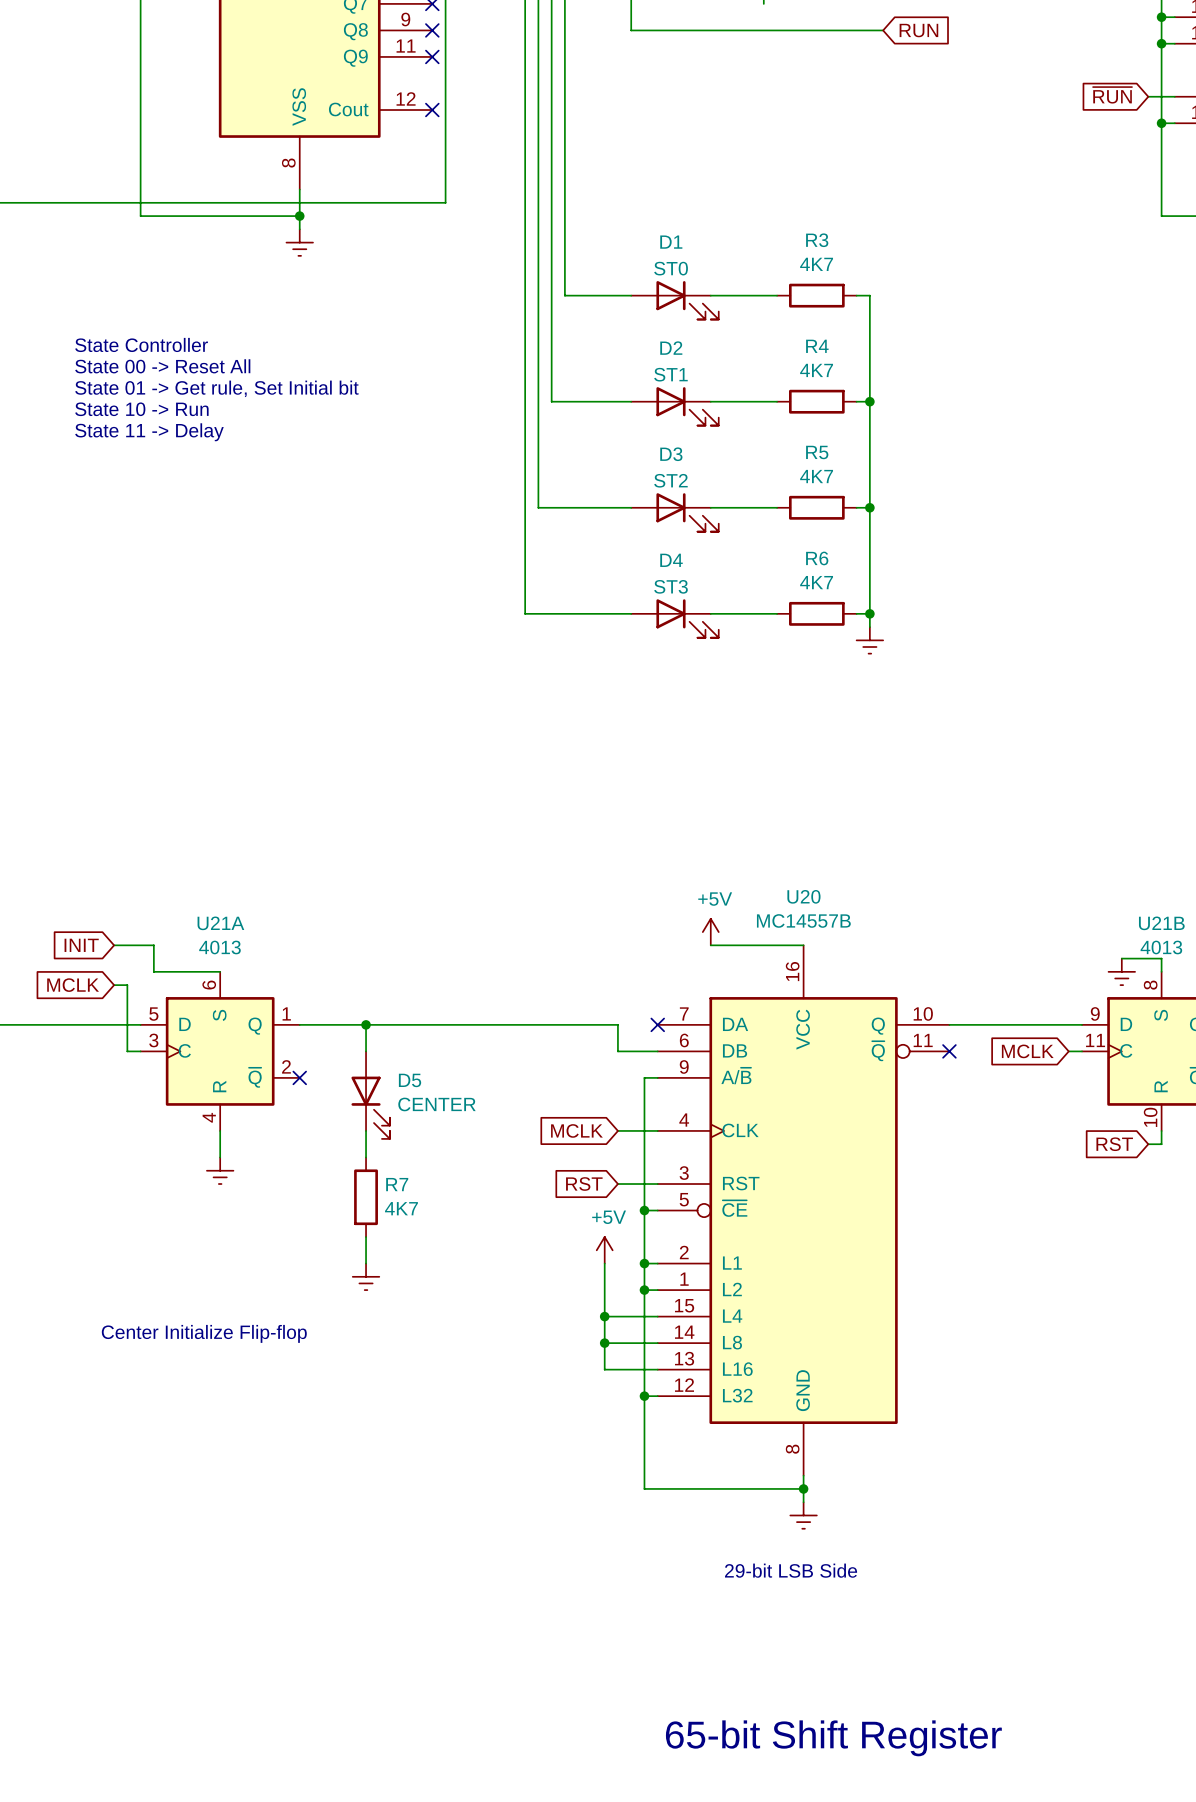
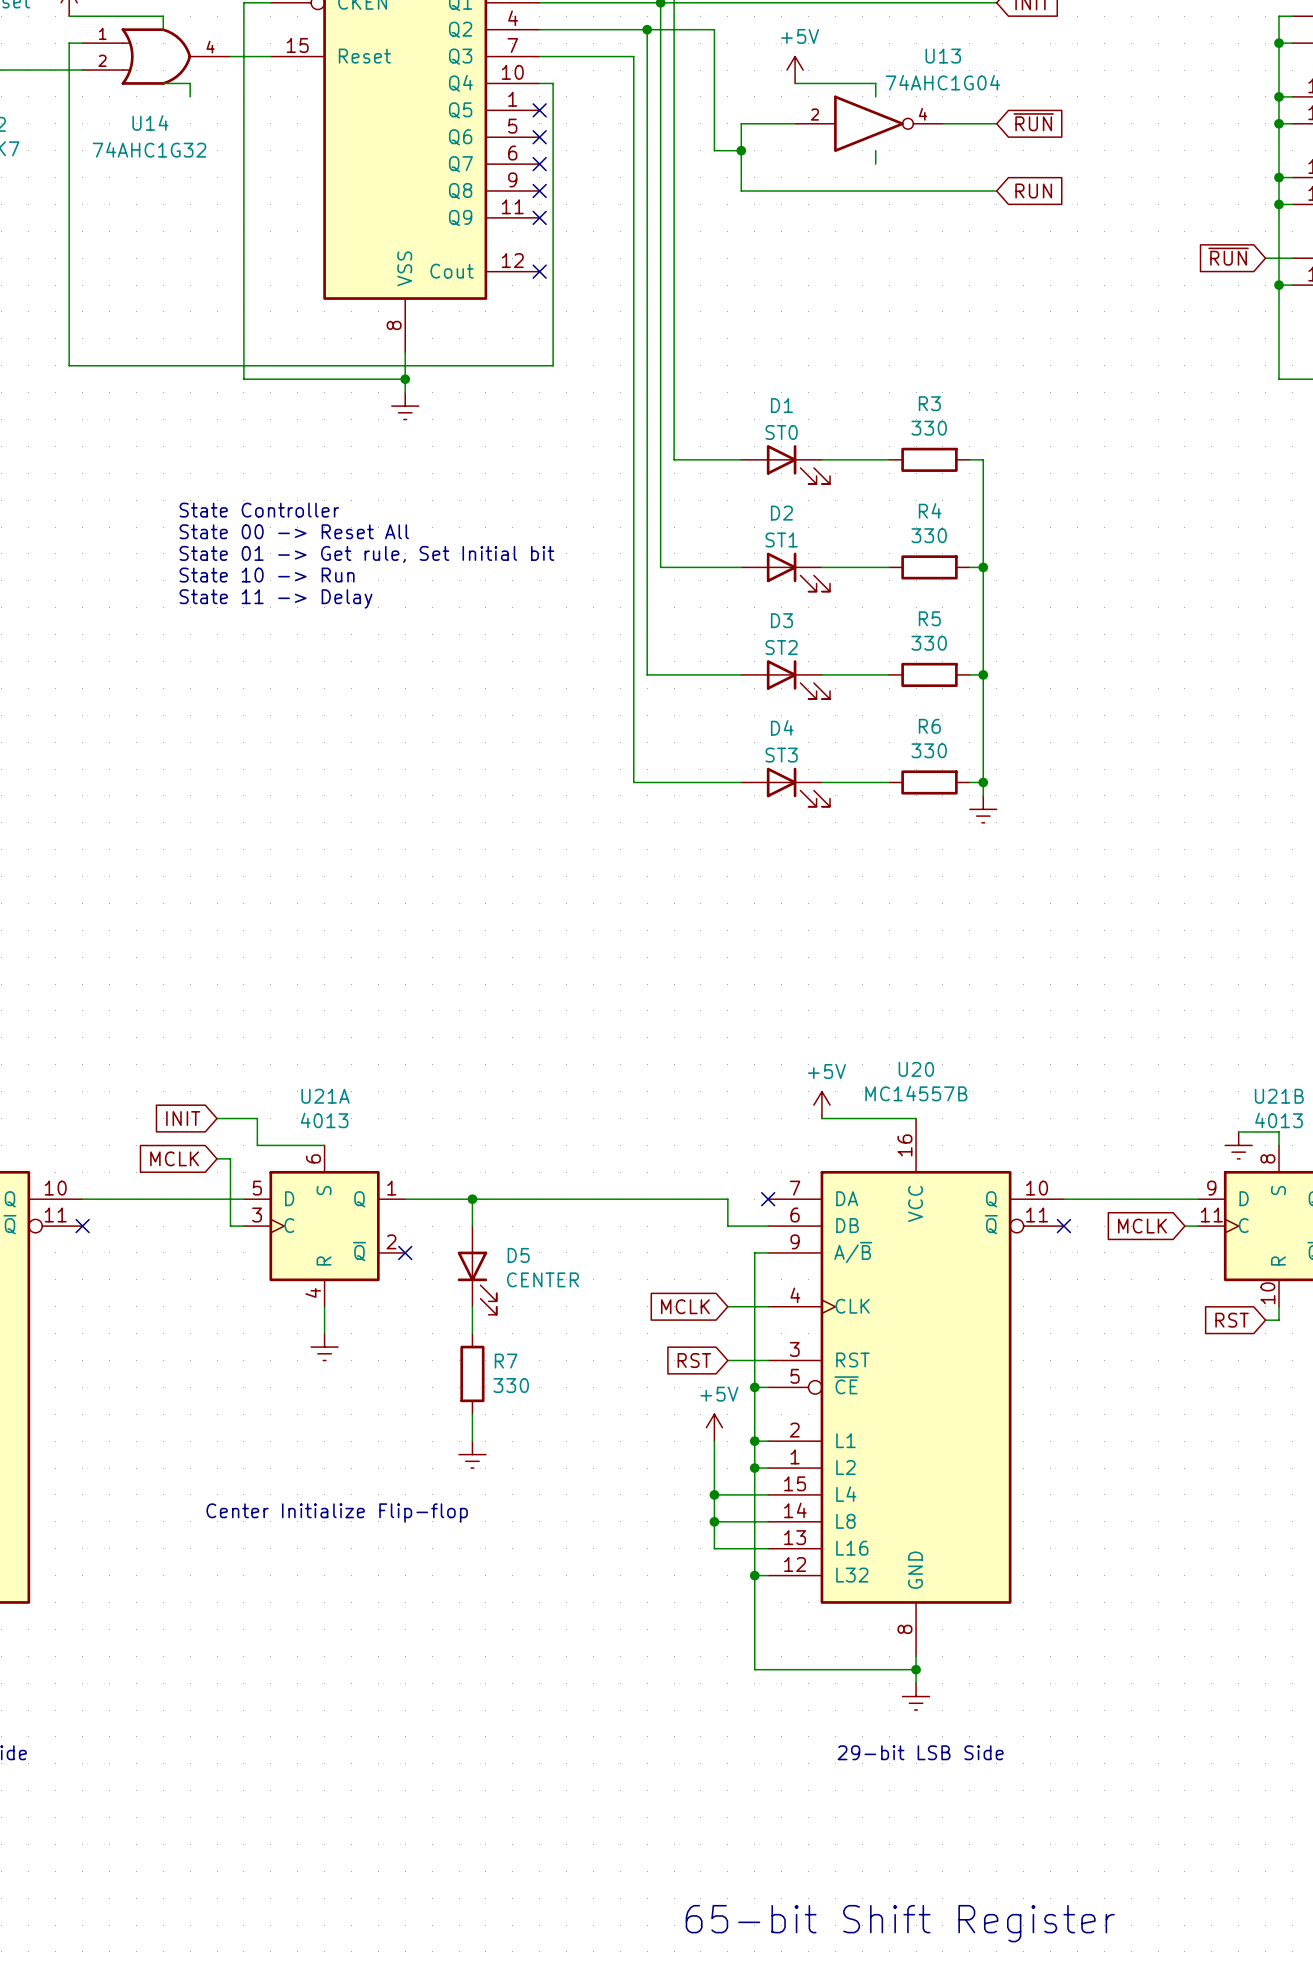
R3 value: 4K7 (816, 264) -> 330 (929, 428)
R4 value: 4K7 (816, 370) -> 330 (929, 535)
R5 value: 4K7 (816, 476) -> 330 (929, 643)
R6 value: 4K7 (816, 582) -> 330 (929, 750)
R7 value: 4K7 (401, 1208) -> 330 (511, 1385)

